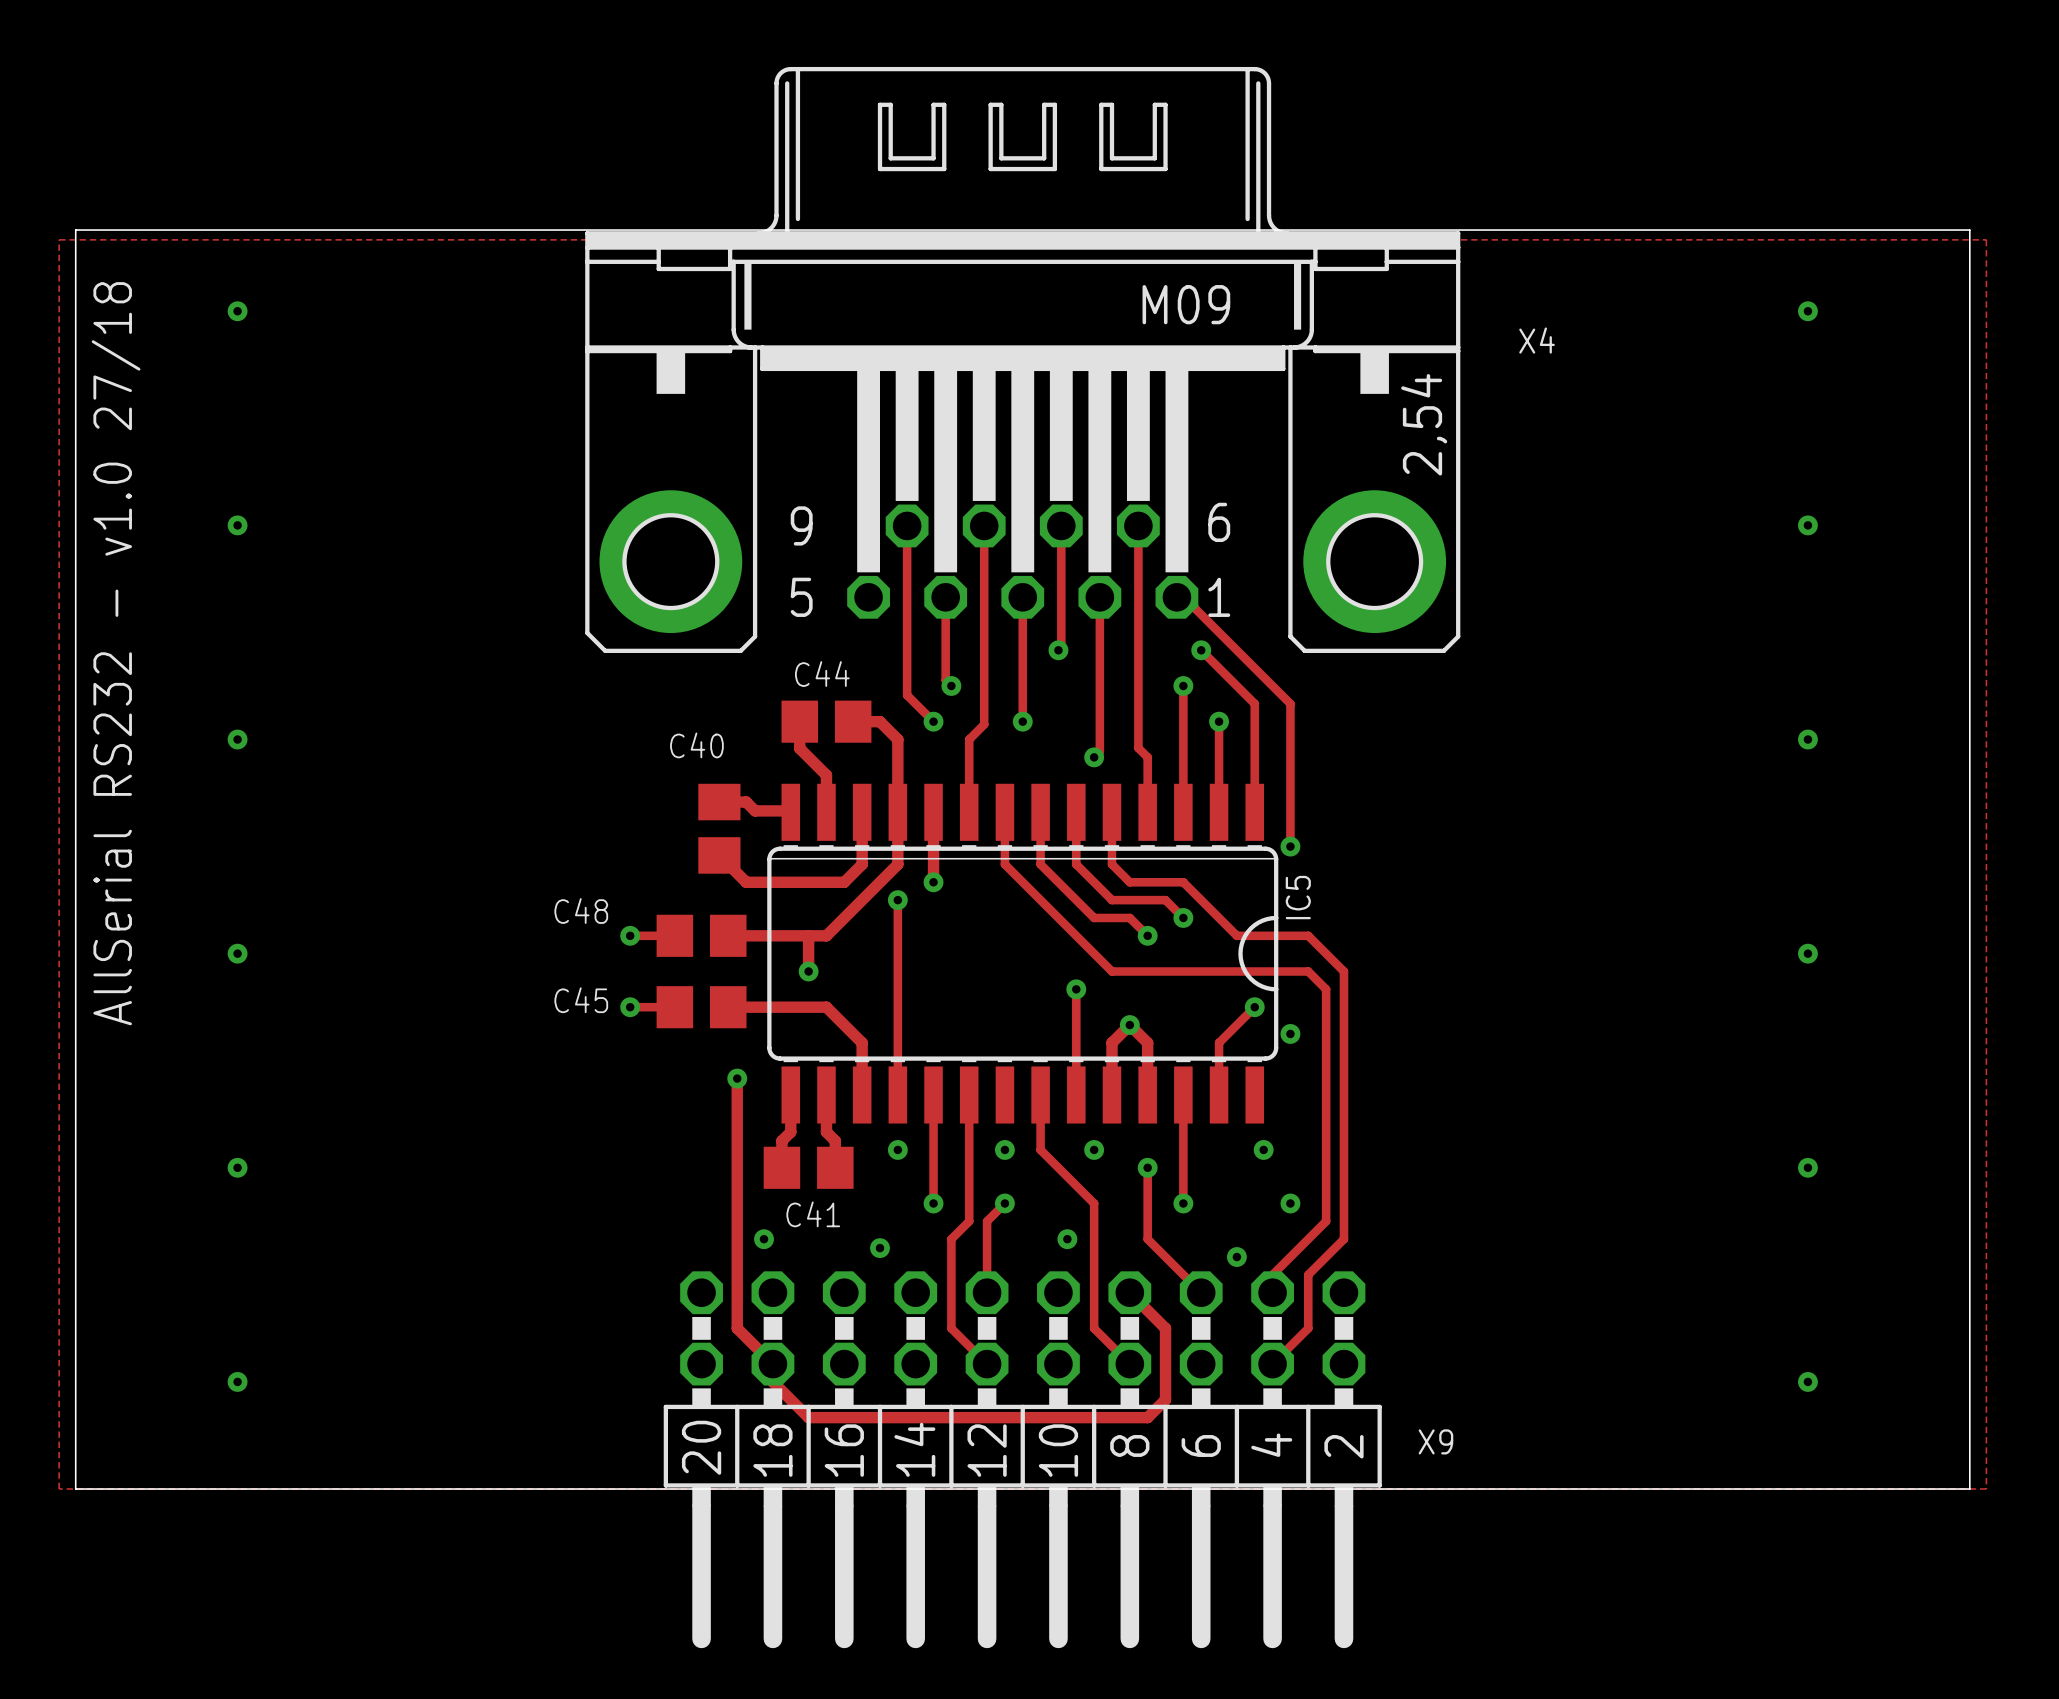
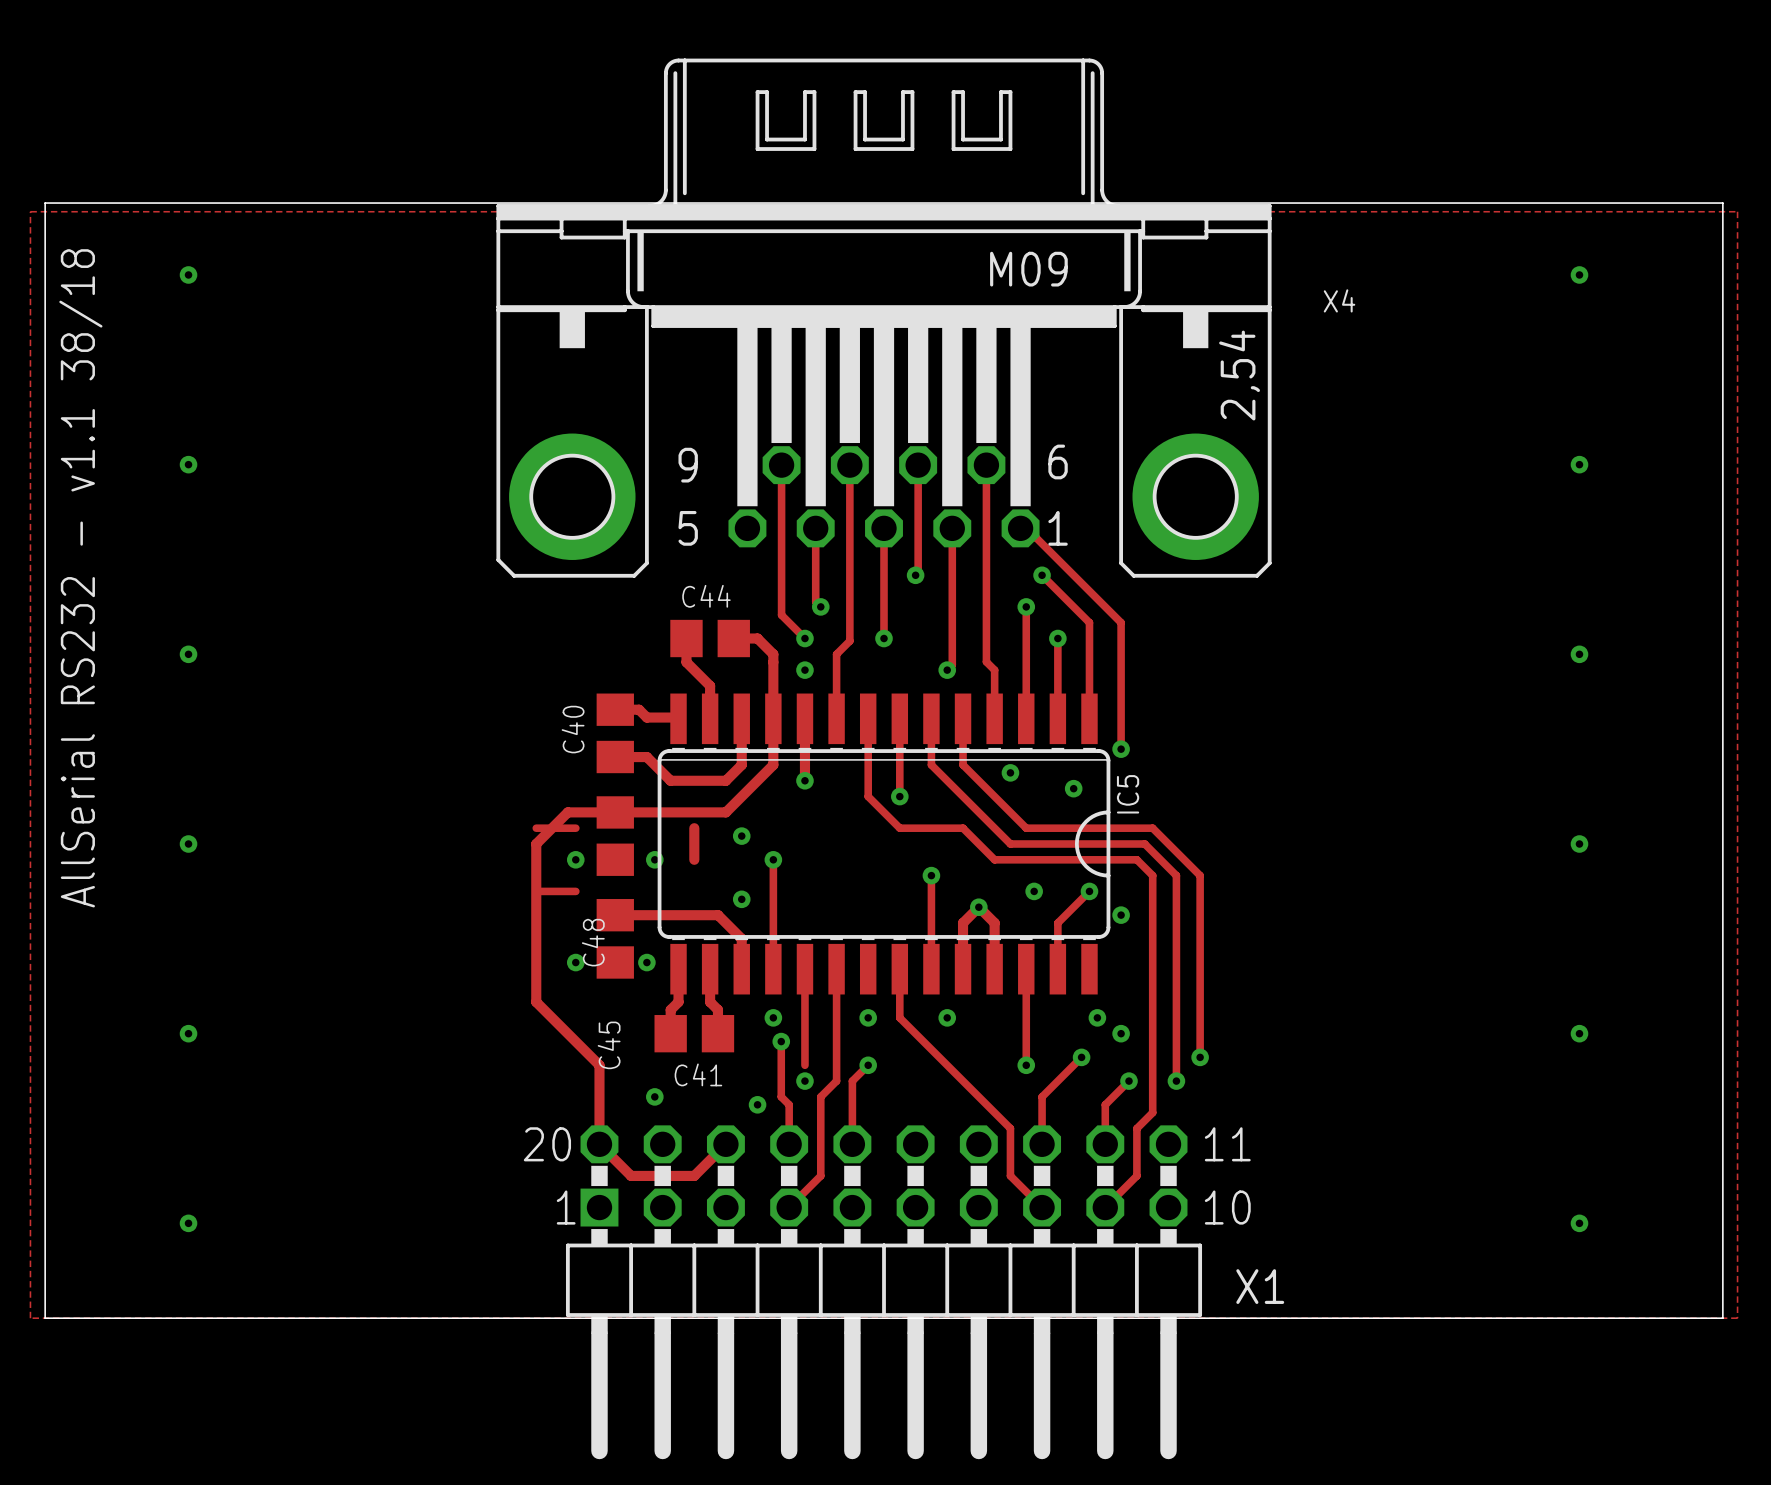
text: AllSerial RS232 - v1.0 27/18 (116, 653) -> AllSerial RS232 - v1.1 38/18 (80, 578)
C40 name rotation: 0° (696, 745) -> 90° counterclockwise (573, 729)
C40 name position: C40 (696, 745) -> C40 (573, 729)
via: none -> (804, 670)
track: (719, 855) (746, 882) (781, 882) -> (615, 757) (646, 757) (670, 780)
track: (1004, 864) (1111, 971) (1147, 971) -> (868, 764) (868, 796) (899, 828) (963, 828) (994, 859)
track: (1040, 864) (1094, 917) (1129, 917) -> (899, 764) (899, 796)
via: none -> (1010, 772)
track: (1129, 882) (1183, 882) (1236, 935) -> (978, 780) (1026, 828) (1073, 828)
via: none -> (1073, 788)
track: (897, 900) (897, 971) -> none
via: (897, 900) -> none
via: none -> (899, 796)
track: (1111, 900) (1165, 900) (1183, 917) -> (963, 796) (978, 812)
C48 name position: C48 (581, 911) -> C48 (593, 942)
track: (844, 917) (826, 935) (728, 935) -> (725, 812) (567, 812) (536, 844) (536, 1002) (599, 1065) (599, 1144) (631, 1175) (694, 1175) (725, 1144)
via: (1183, 917) -> none
via: (630, 935) -> none
C48 rotation: 0° (701, 935) -> 90° clockwise (615, 836)
track: none -> (994, 828) (1010, 844) (1144, 844) (1176, 875) (1176, 1081)
via: (1147, 935) -> none
track: (1308, 935) (1343, 971) (1343, 1239) (1326, 1257) -> (1136, 828) (1152, 828) (1200, 875) (1200, 1057)
X9: (1022, 939) -> none
X1: none -> (884, 831)
via: none -> (741, 836)
via: none -> (575, 859)
via: none -> (654, 859)
via: (808, 971) -> none
via: none -> (773, 859)
C45 name position: C45 (581, 1000) -> C45 (609, 1045)
via: (630, 1007) -> none
C45 rotation: 0° (701, 1007) -> 90° clockwise (615, 938)
C45 position: (701, 1007) -> (615, 938)
track: (728, 1007) (826, 1007) (862, 1042) (862, 1060) -> (615, 915) (718, 915) (741, 938)
via: none -> (1034, 891)
via: none -> (741, 899)
track: (737, 1078) (737, 1328) (772, 1364) (772, 1381) (808, 1417) (1147, 1417) (1165, 1399) (1165, 1328) (1129, 1292) -> none
via position: (737, 1078) -> (646, 962)
via: none -> (575, 962)
track: (1147, 1167) (1147, 1239) (1201, 1292) -> (1081, 1057) (1042, 1096) (1042, 1144)
via: (1147, 1167) -> none
via: none -> (1121, 1033)
track: none -> (781, 1041) (781, 1096) (789, 1104) (789, 1144)
via: none -> (781, 1041)
via: none -> (1081, 1057)
via: none -> (1200, 1057)
via position: (933, 1203) -> (804, 1081)
track: (1094, 1203) (1094, 1328) (1129, 1364) -> (947, 1065) (1010, 1128) (1010, 1175) (1042, 1207)
via position: (1290, 1203) -> (1129, 1081)
track: (1326, 1221) (1272, 1274) -> (1129, 1081) (1105, 1104) (1105, 1128)
via: none -> (1176, 1081)
via: (1067, 1239) -> none
via: (1236, 1257) -> none
track: (951, 1328) (987, 1364) -> (820, 1175) (789, 1207)

